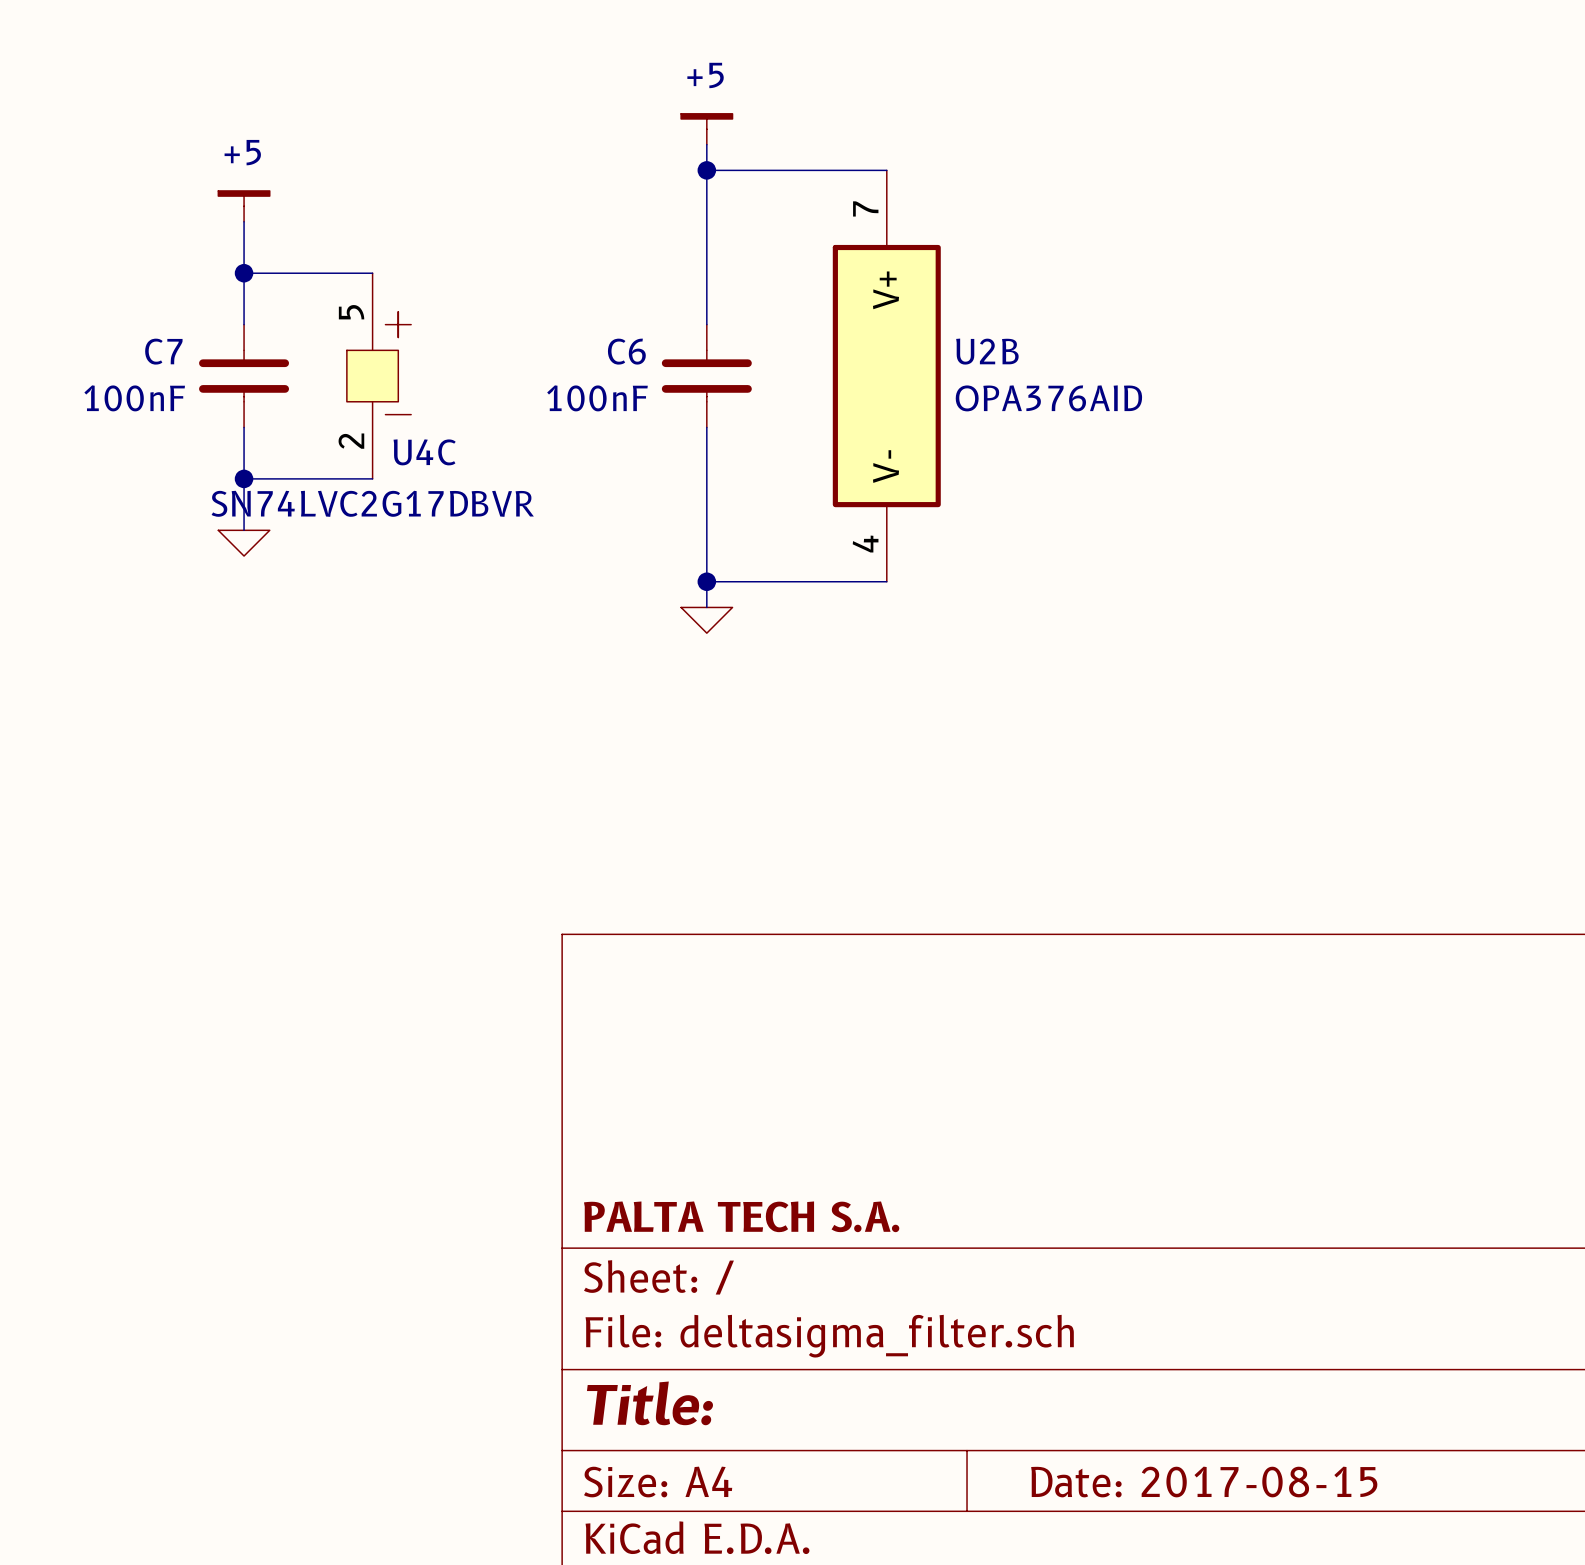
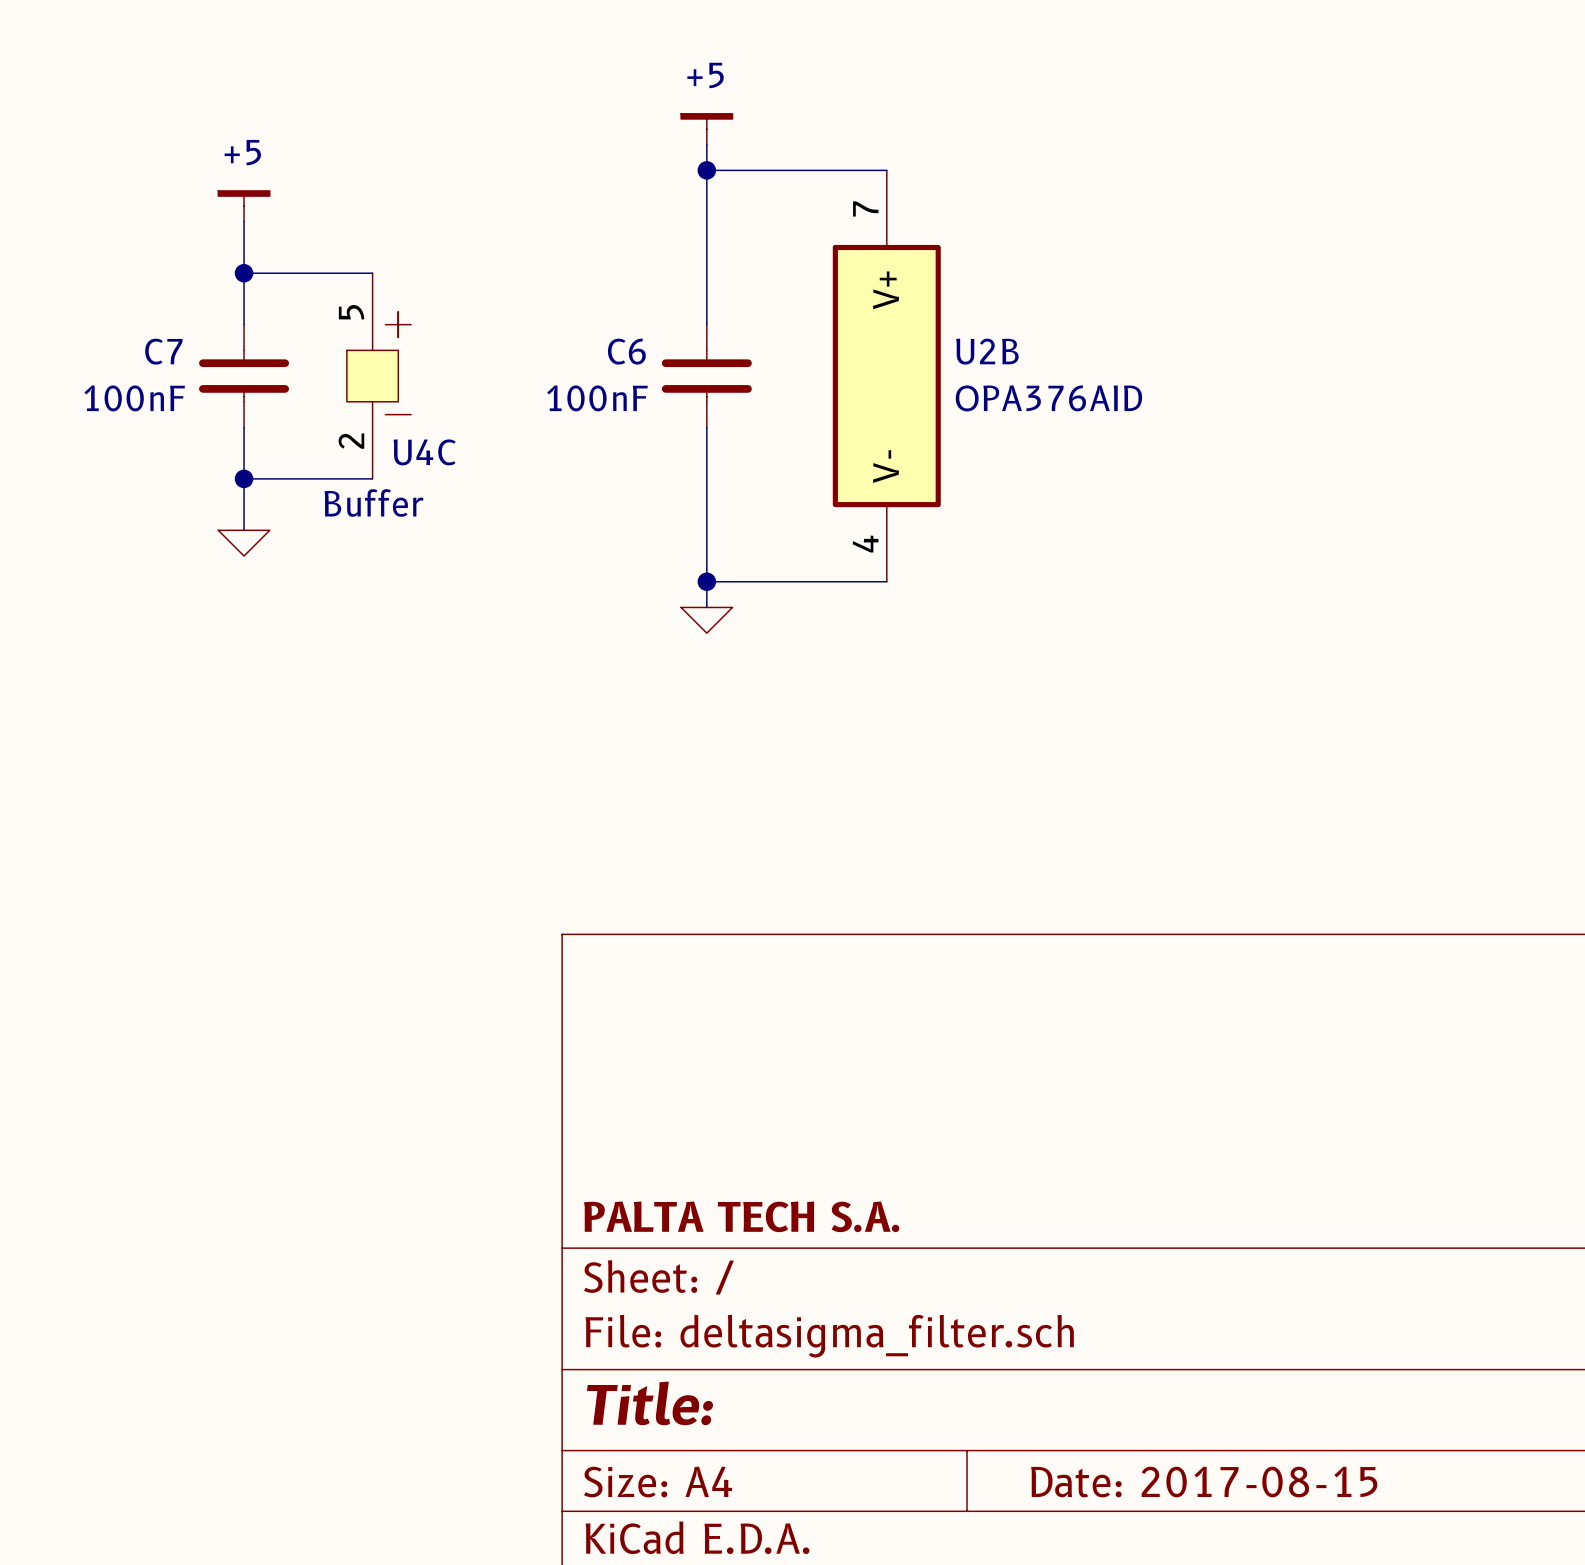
U4C value: SN74LVC2G17DBVR (372, 503) -> Buffer (373, 502)

